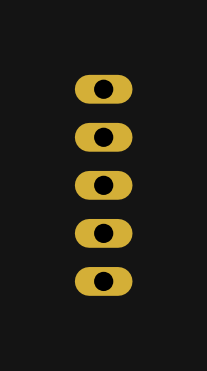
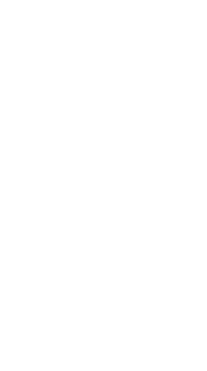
part: (103, 185) -> none

